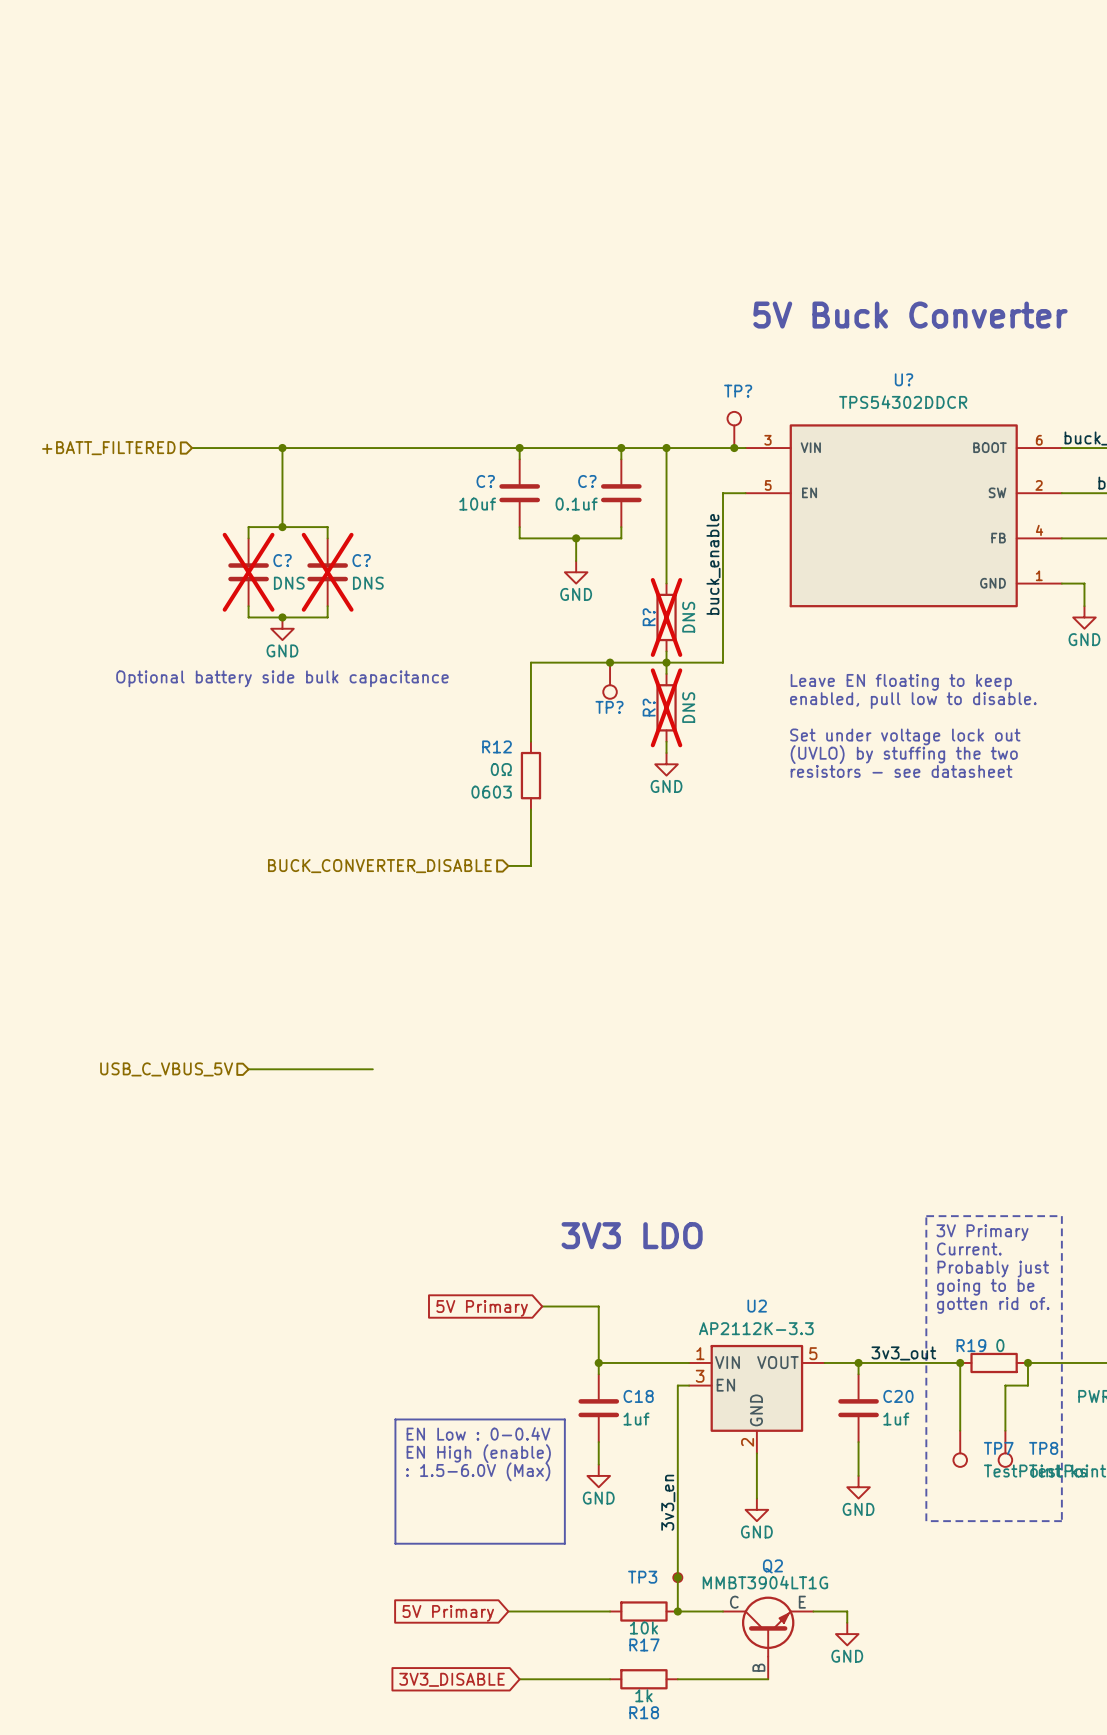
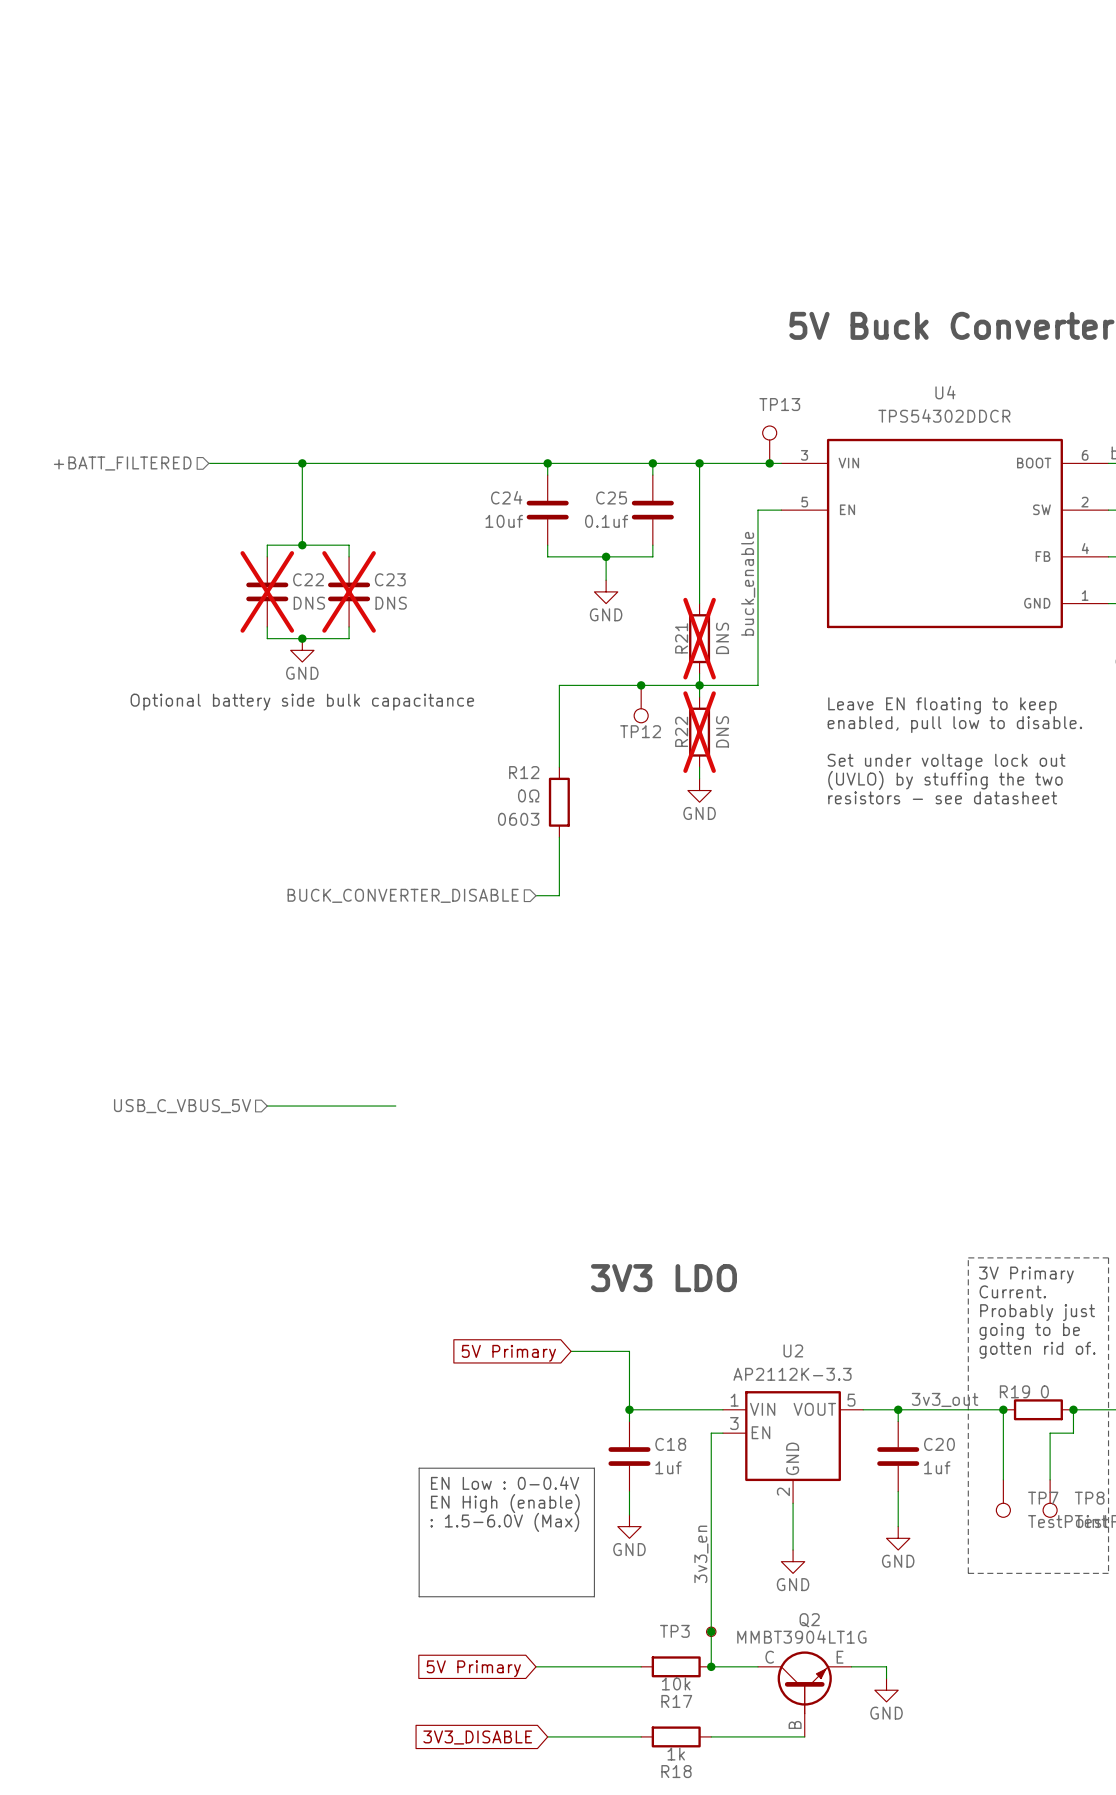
U? name: U? (904, 379) -> U4 (945, 392)
TP? name: TP? (738, 391) -> TP13 (779, 404)
C? name: C? (485, 481) -> C24 (506, 497)
C? name: C? (587, 481) -> C25 (611, 498)
C? name: C? (282, 560) -> C22 (308, 579)
C? name: C? (361, 560) -> C23 (390, 579)
R? name: R? (649, 617) -> R21 (681, 638)
TP? name: TP? (609, 707) -> TP12 (640, 731)
R? name: R? (649, 707) -> R22 (681, 731)

